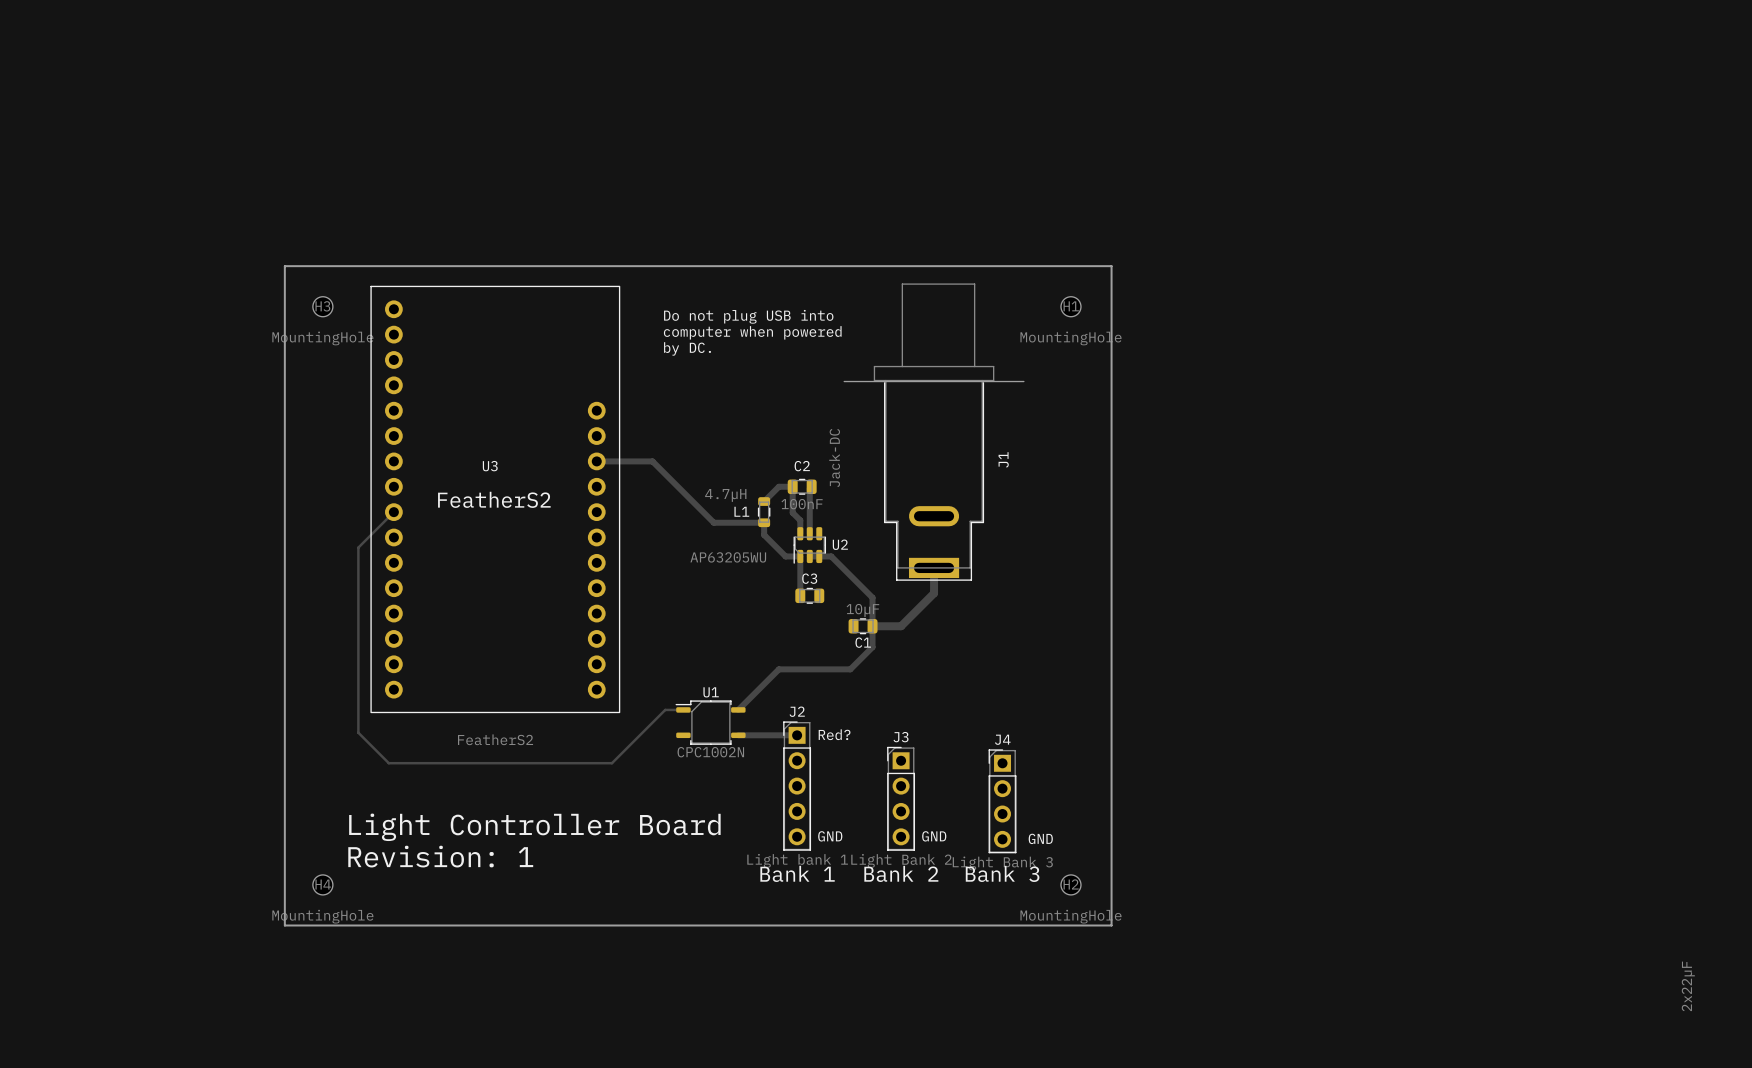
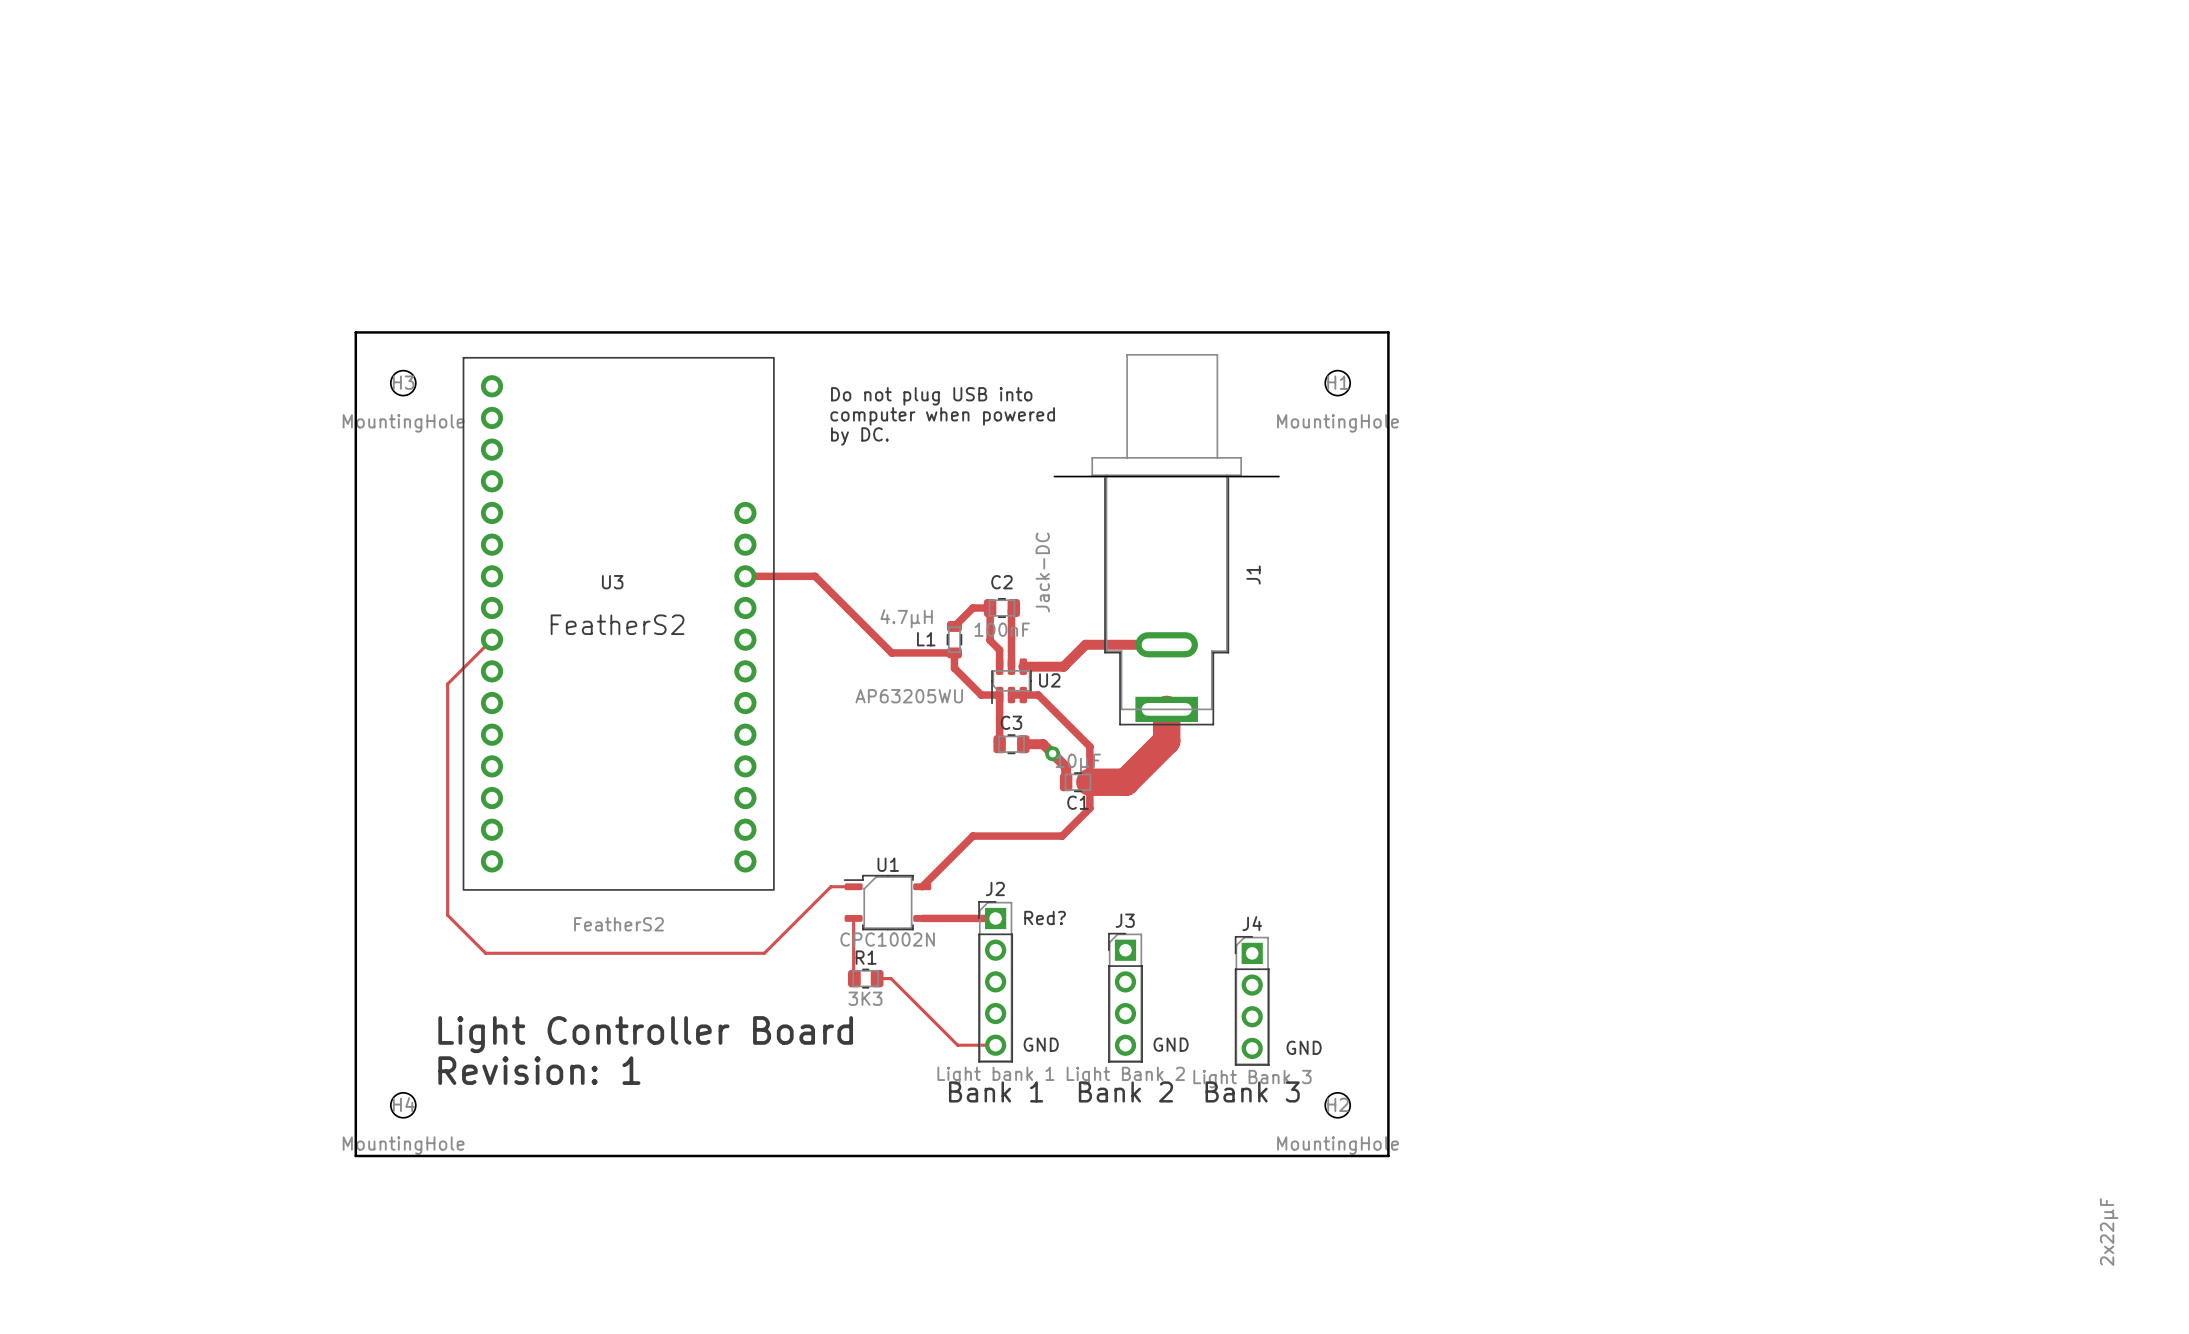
track: none -> (1166, 644) (1085, 644) (1063, 666) (1023, 666)
track width: thin (934, 567) (934, 593) (901, 626) (872, 626) -> thick (1166, 709) (1166, 741) (1125, 782) (1089, 782)
track: none -> (1023, 744) (1043, 744) (1066, 767) (1066, 782)
via: none -> (1052, 753)
track: none -> (853, 918) (854, 978)
R1: none -> 3K3 (865, 978)
track: none -> (877, 978) (891, 978) (957, 1045) (995, 1045)

